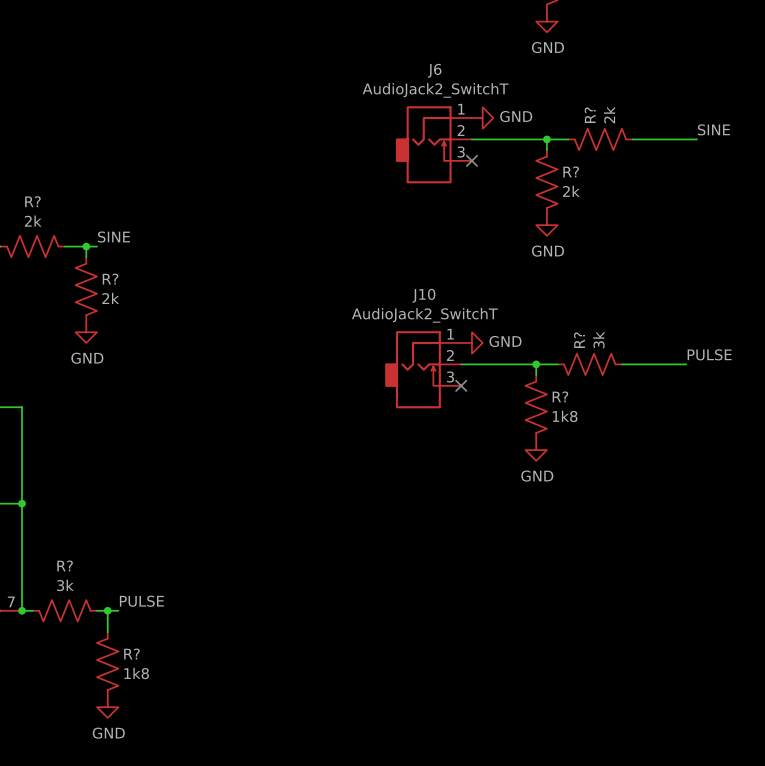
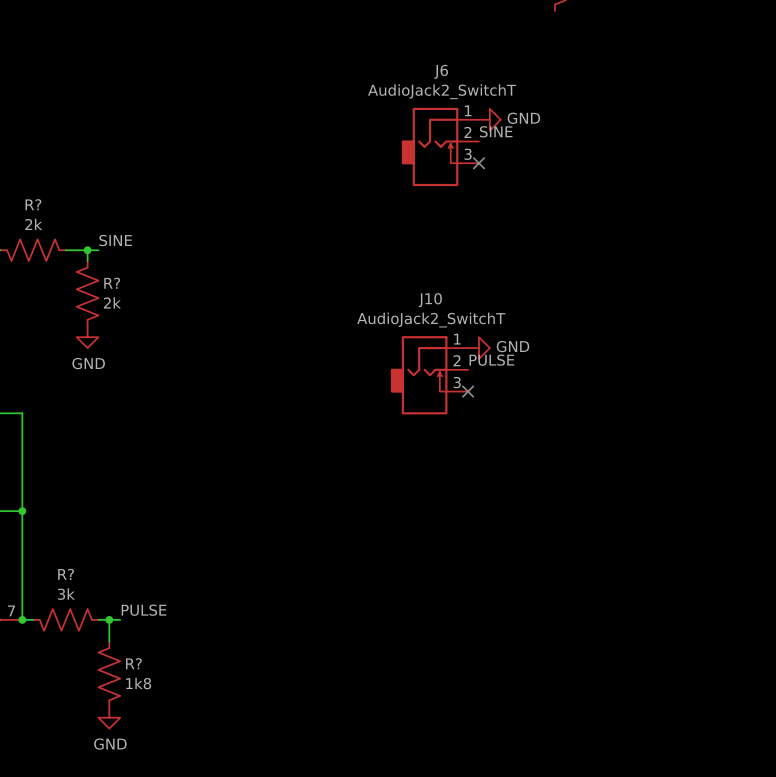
power symbol: GND (546, 21) -> none
label: none -> SINE (496, 131)
label: SINE (713, 129) -> none
wire: (471, 139) (568, 139) -> none
wire: (546, 139) (546, 150) -> none
junction: (546, 139) -> none
R?: 2k (600, 139) -> none
wire: (632, 139) (696, 139) -> none
R?: 2k (546, 182) -> none
power symbol: GND (546, 225) -> none
label: none -> PULSE (491, 360)
label: PULSE (709, 354) -> none
wire: (461, 364) (557, 364) -> none
wire: (536, 364) (536, 375) -> none
junction: (536, 364) -> none
R?: 3k (589, 364) -> none
wire: (621, 364) (686, 364) -> none
R?: 1k8 (536, 407) -> none
power symbol: GND (536, 450) -> none

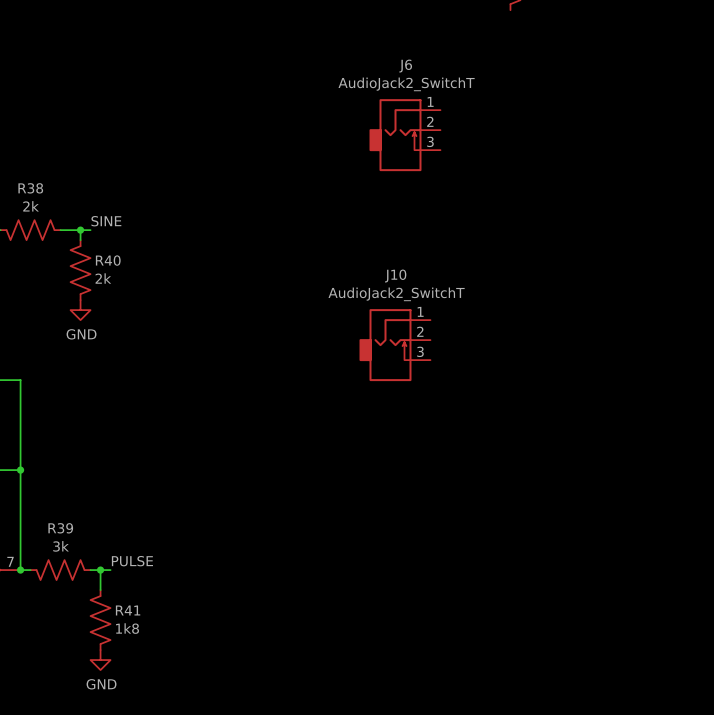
power symbol: GND (489, 119) -> none
label: SINE (496, 131) -> none
no-connect mark: (478, 163) -> none
R? name: R? (33, 204) -> R38 (30, 188)
R? name: R? (112, 283) -> R40 (108, 260)
power symbol: GND (478, 348) -> none
label: PULSE (491, 360) -> none
no-connect mark: (468, 391) -> none
R? name: R? (66, 574) -> R39 (60, 528)
R? name: R? (133, 663) -> R41 (128, 610)

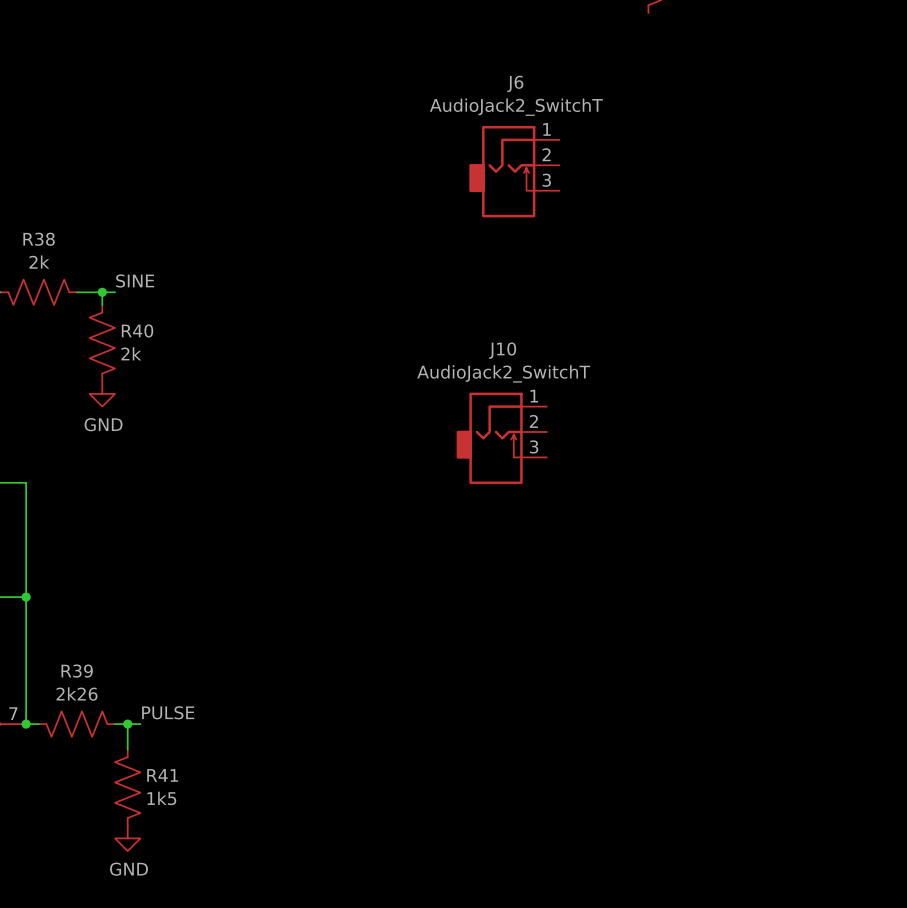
R39 value: 3k (61, 546) -> 2k26 (77, 694)
R41 value: 1k8 (127, 628) -> 1k5 (161, 798)

